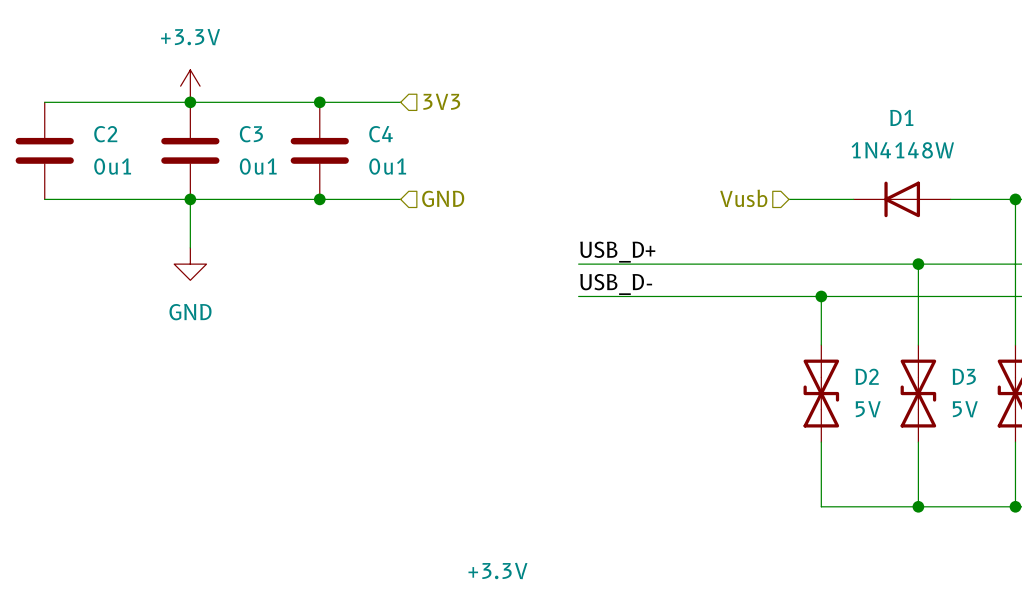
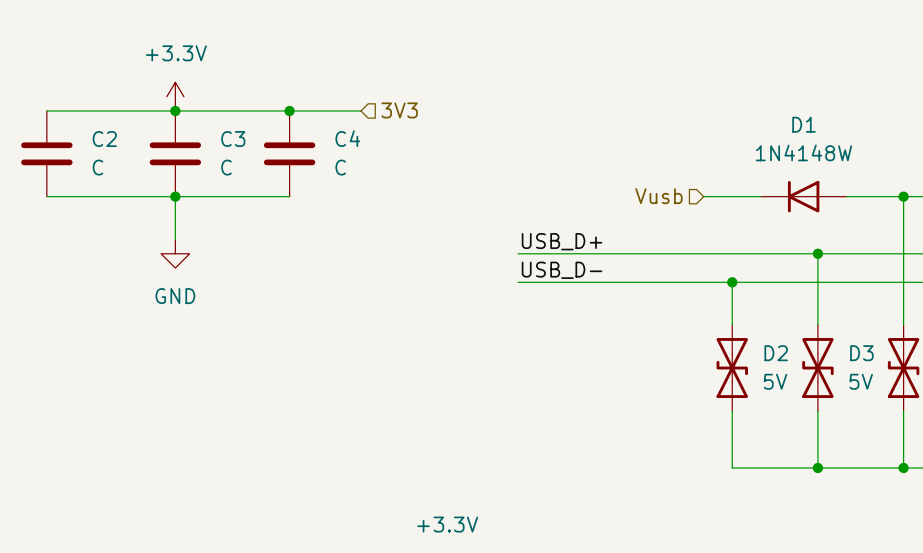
C2 value: 0u1 (112, 166) -> C (97, 167)
C3 value: 0u1 (258, 166) -> C (226, 167)
C4 value: 0u1 (387, 166) -> C (340, 167)
hierarchical label: GND (443, 198) -> none
wire: (319, 199) (400, 199) -> none
junction: (319, 199) -> none

